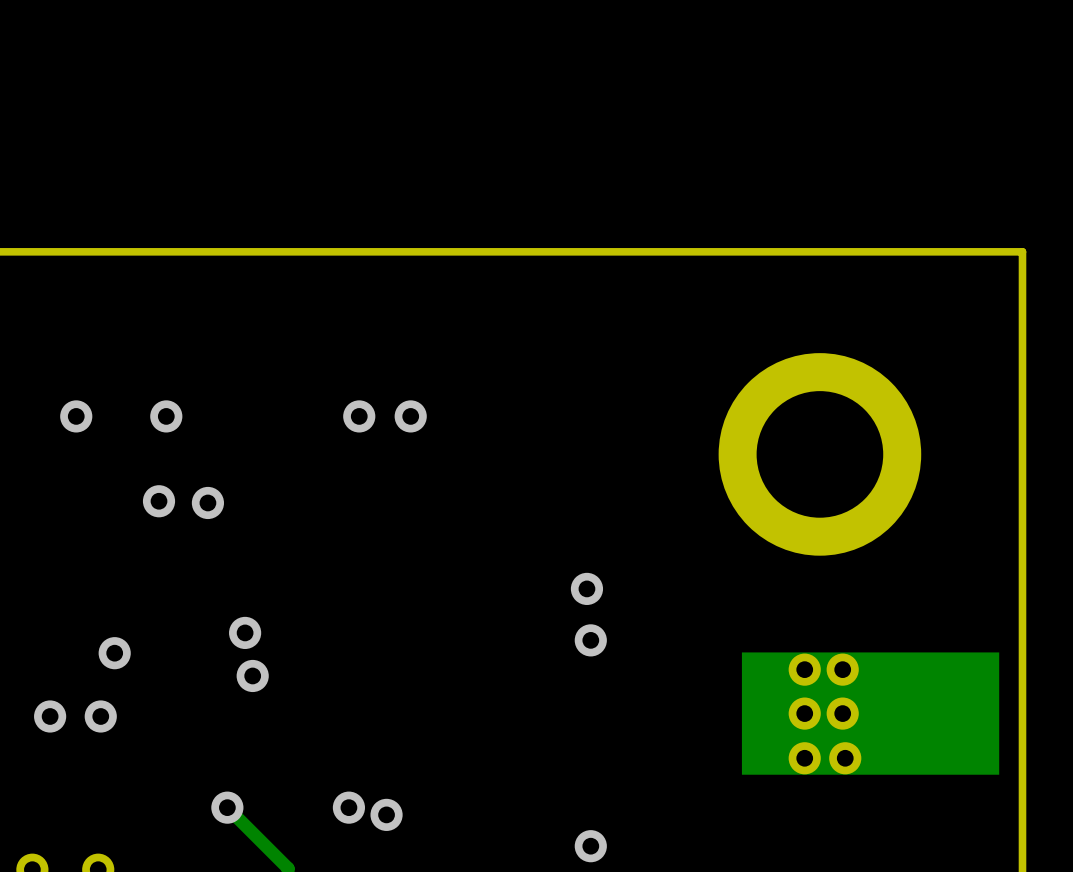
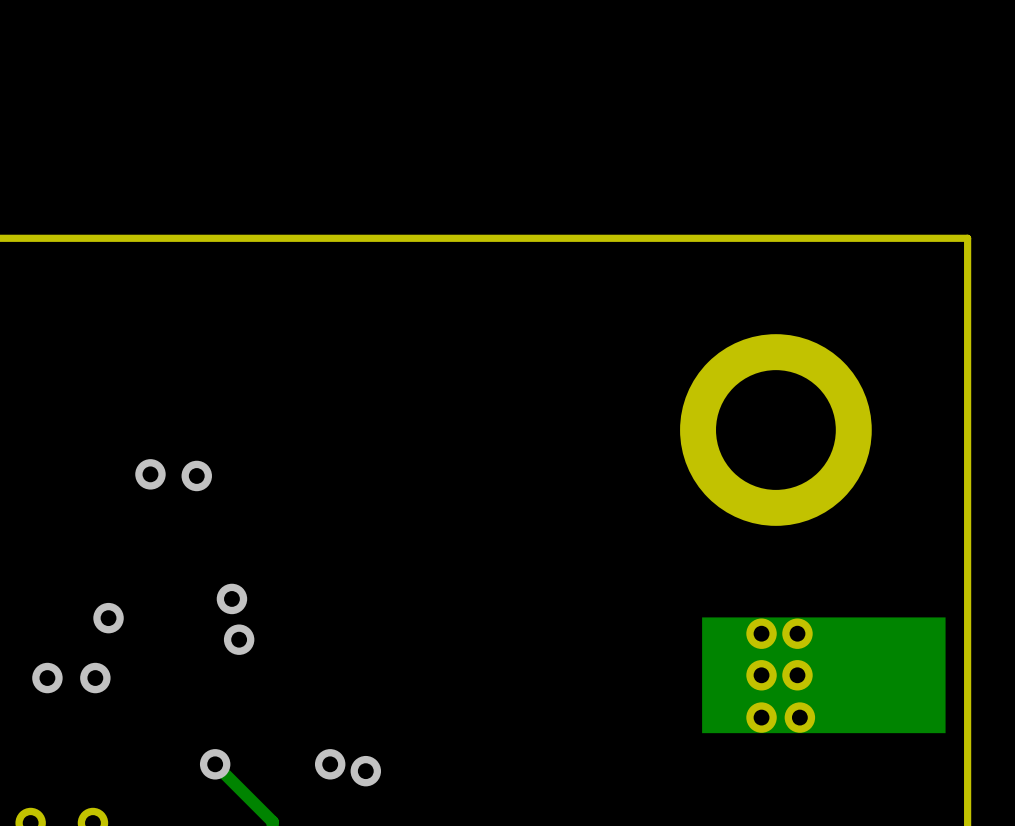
via: (76, 416) -> none
via: (166, 416) -> none
via: (359, 416) -> none
via: (410, 416) -> none
via: (586, 588) -> none
via: (590, 640) -> none
via: (590, 846) -> none

